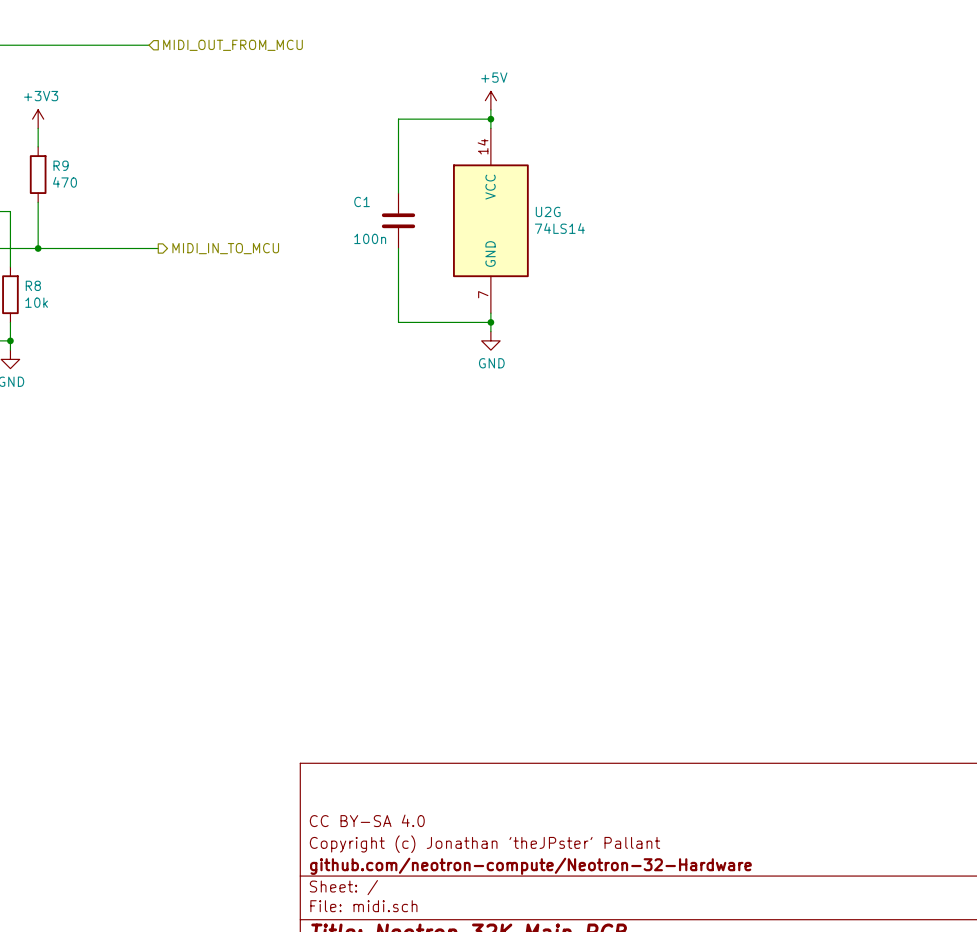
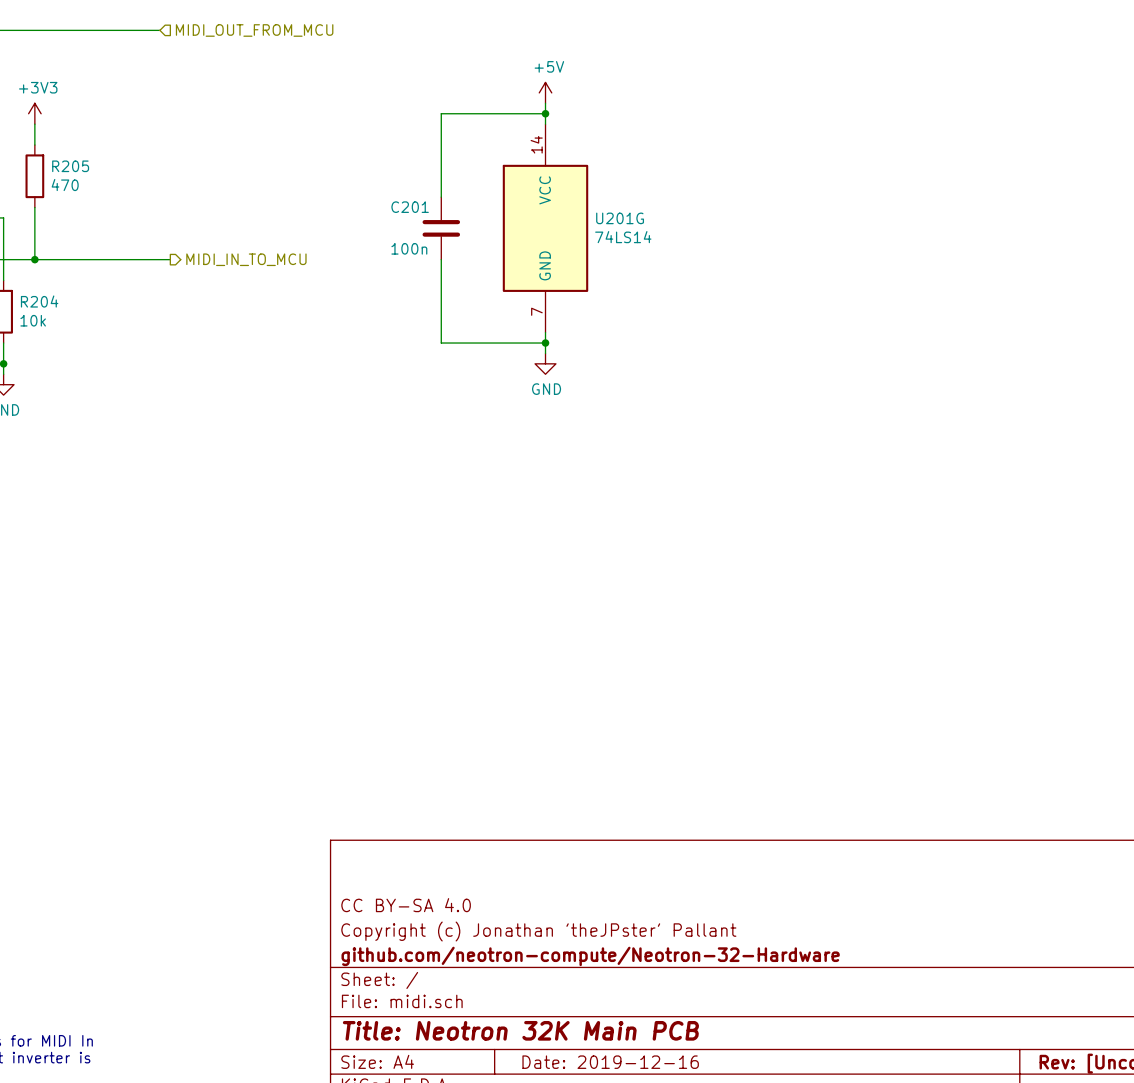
R9 name: R9 (61, 165) -> R205 (70, 166)
C1 name: C1 (362, 201) -> C201 (410, 207)
U2G name: U2G (548, 211) -> U201G (620, 218)
R8 name: R8 (33, 285) -> R204 (39, 301)

